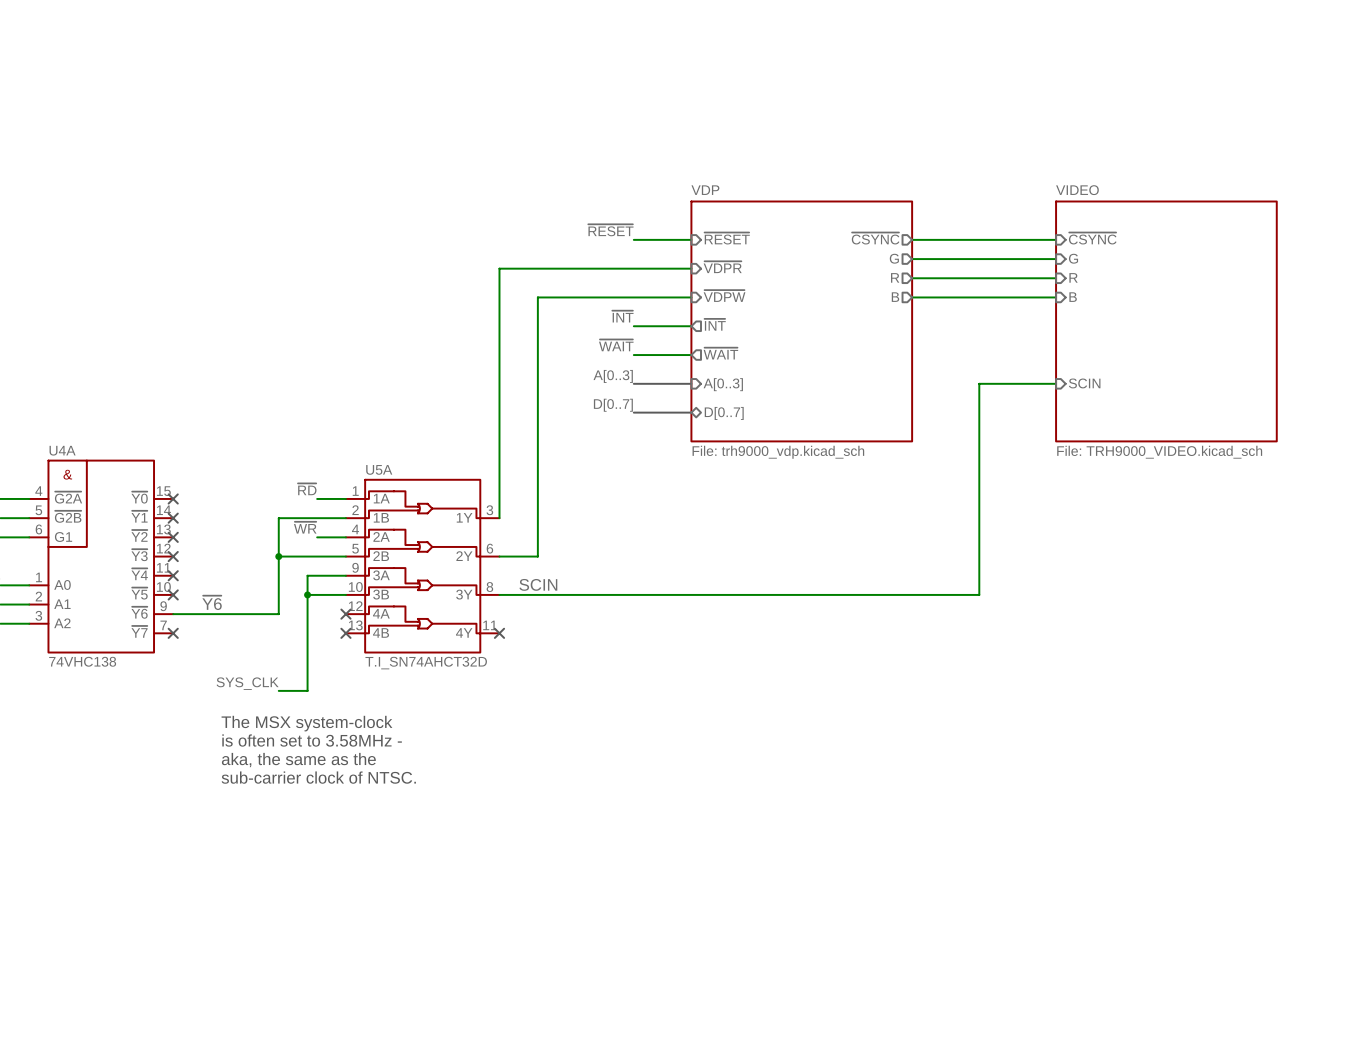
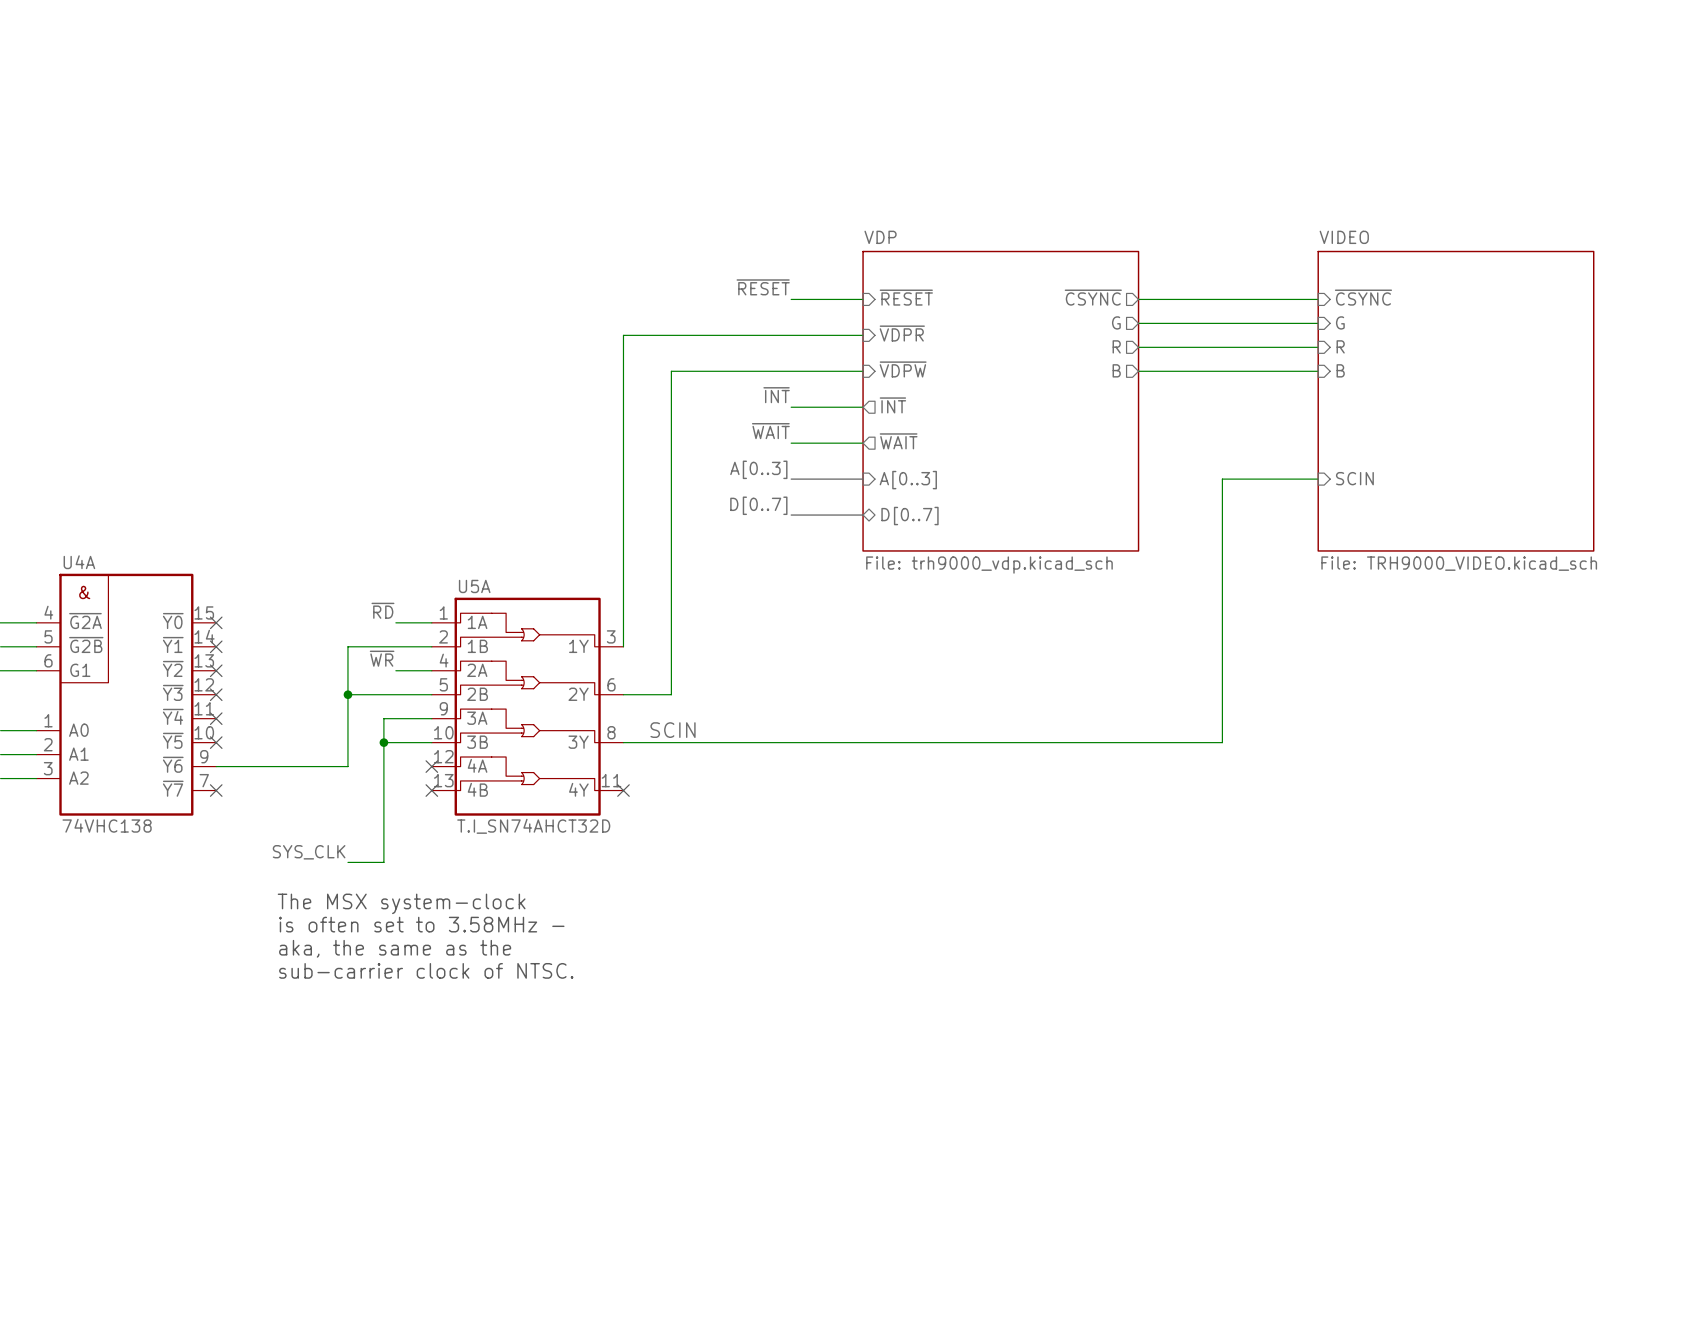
label: ~{Y6} (212, 602) -> none

